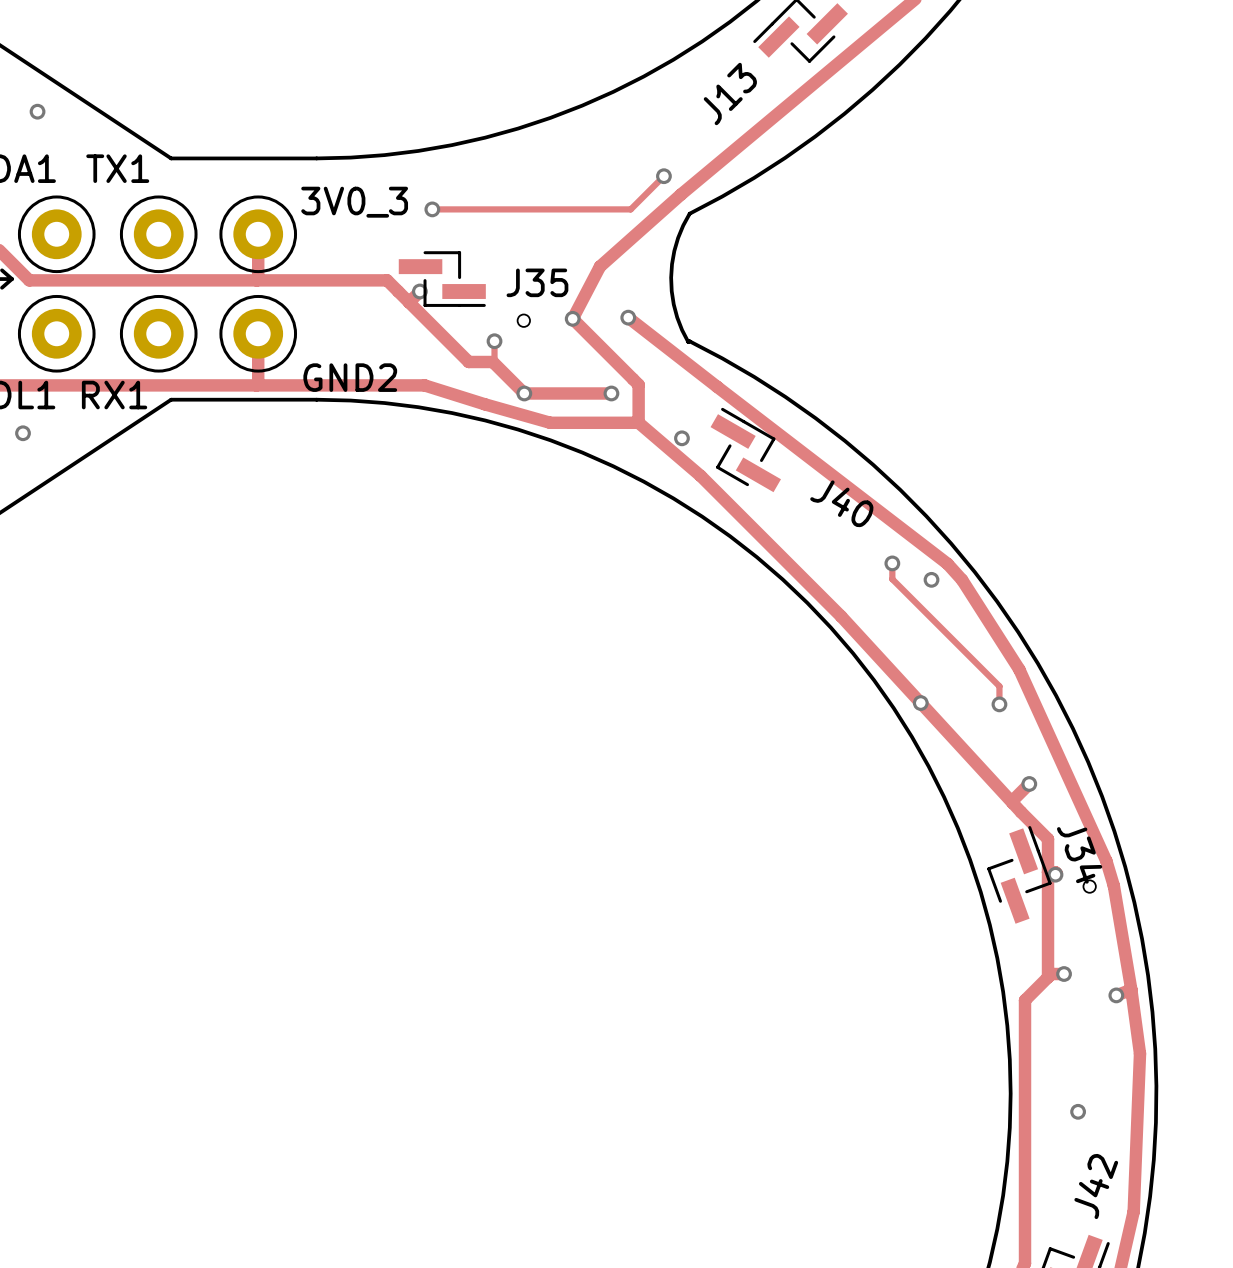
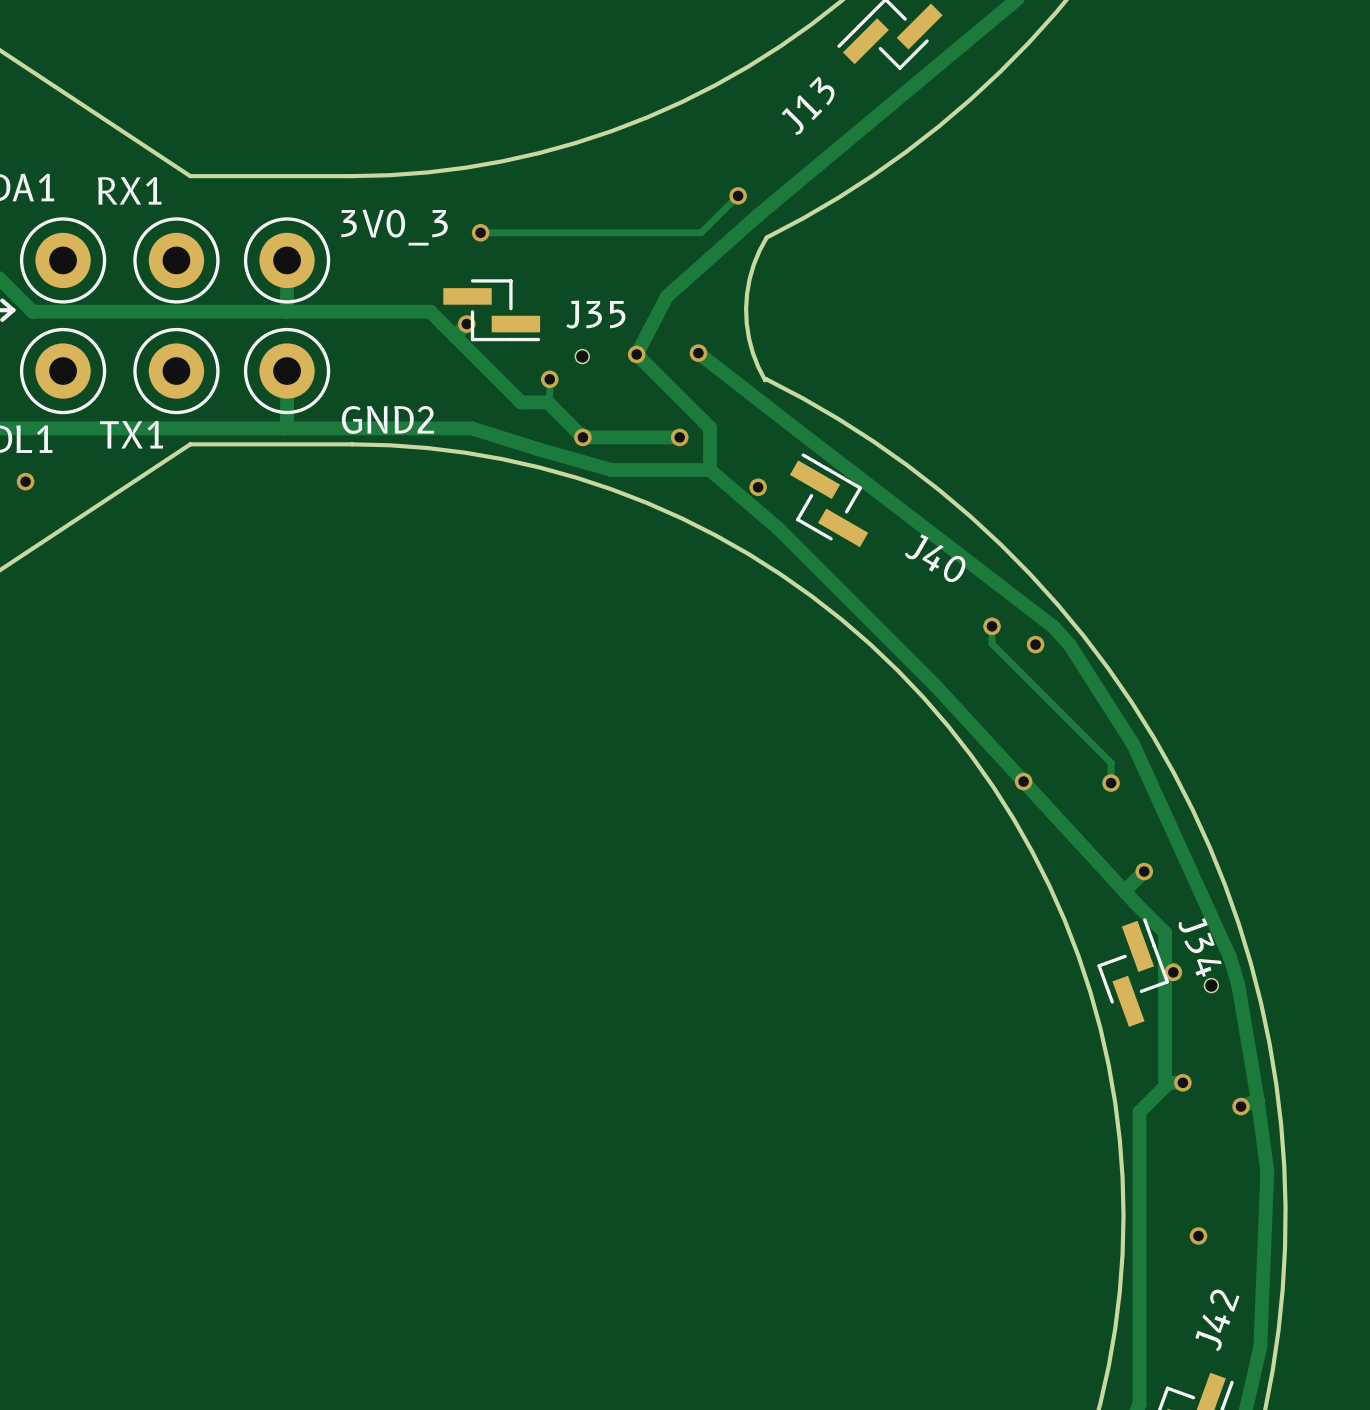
via: (37, 111) -> none
TX1 name: TX1 (117, 168) -> RX1 (129, 190)
RX1 name: RX1 (114, 395) -> TX1 (131, 434)

